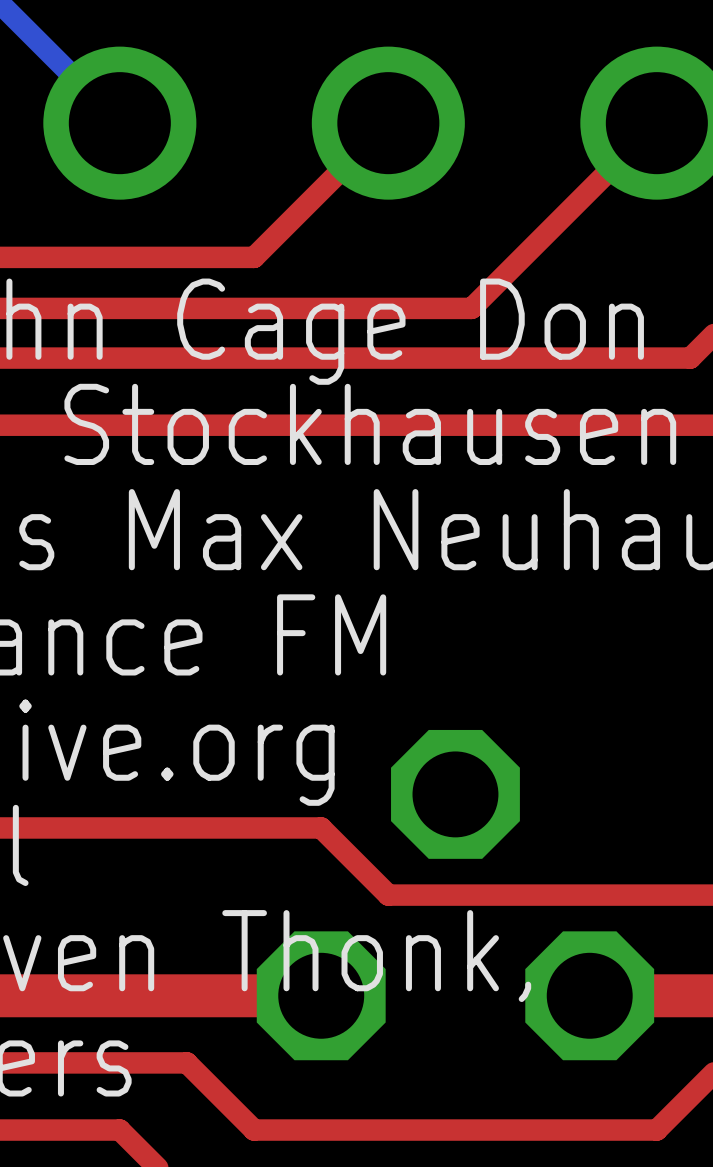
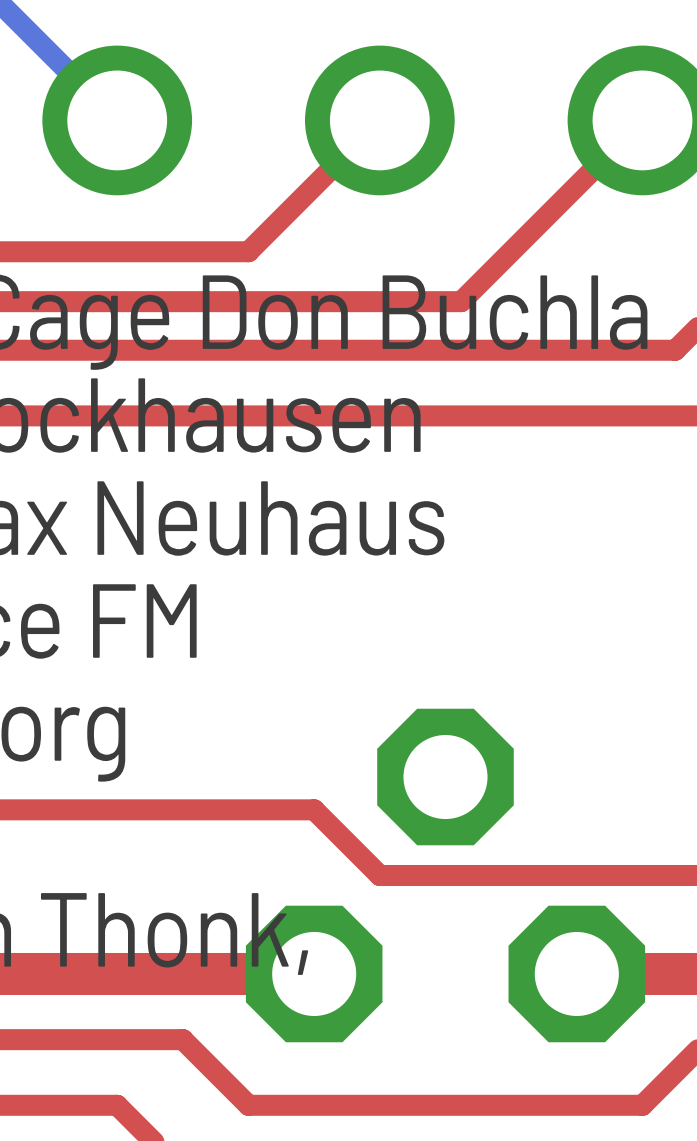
part footprint: [256, 729, 655, 1061] -> [245, 708, 646, 1043]

